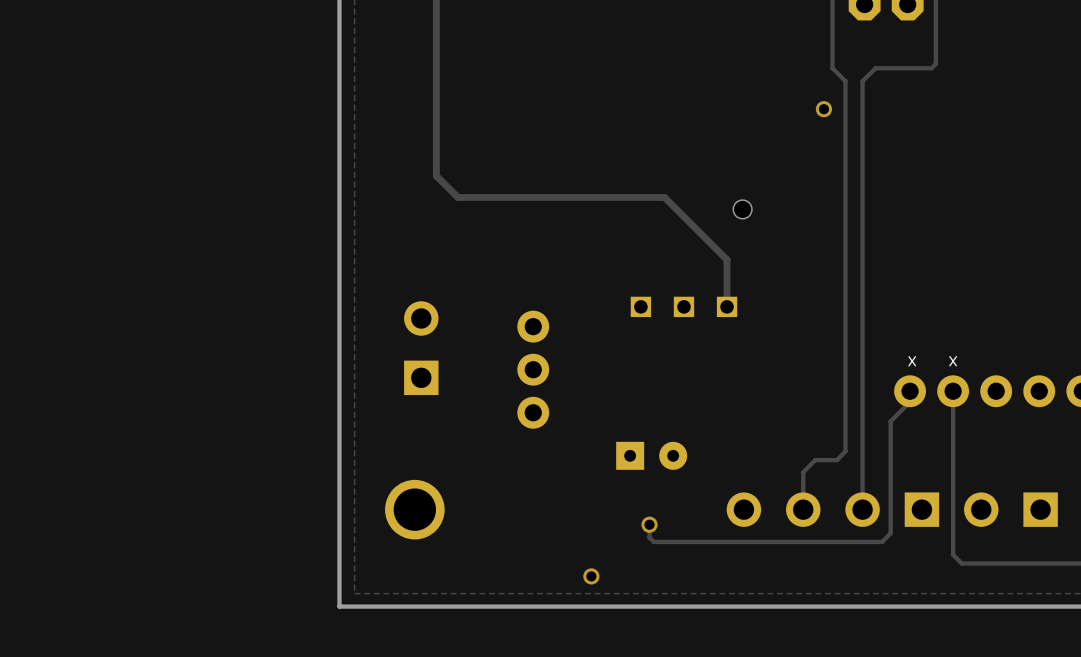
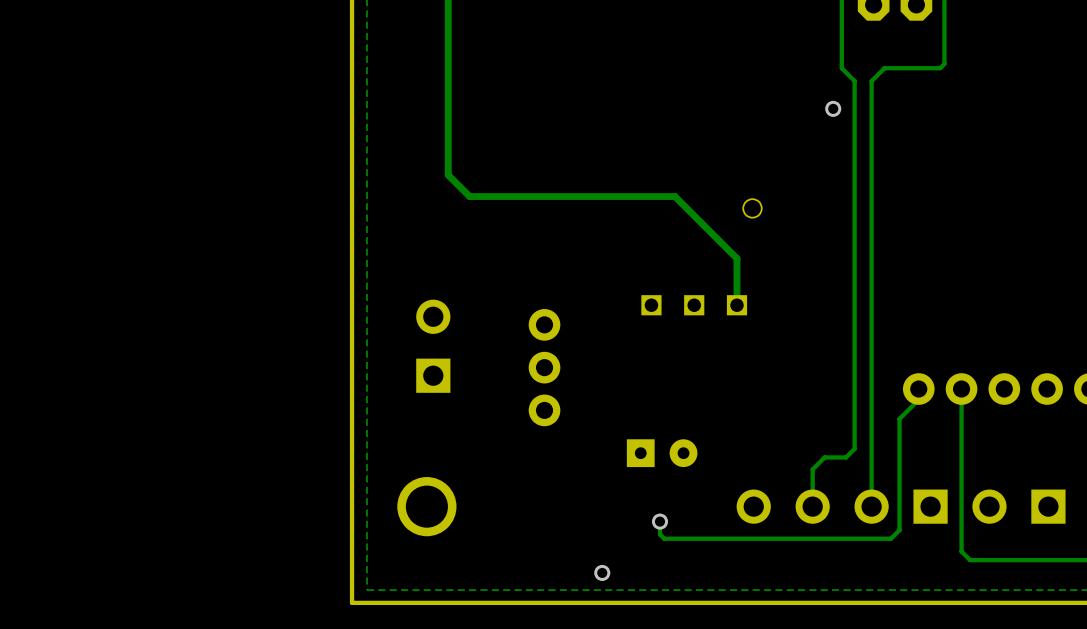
text: x (912, 361) -> none
text: x (953, 361) -> none

